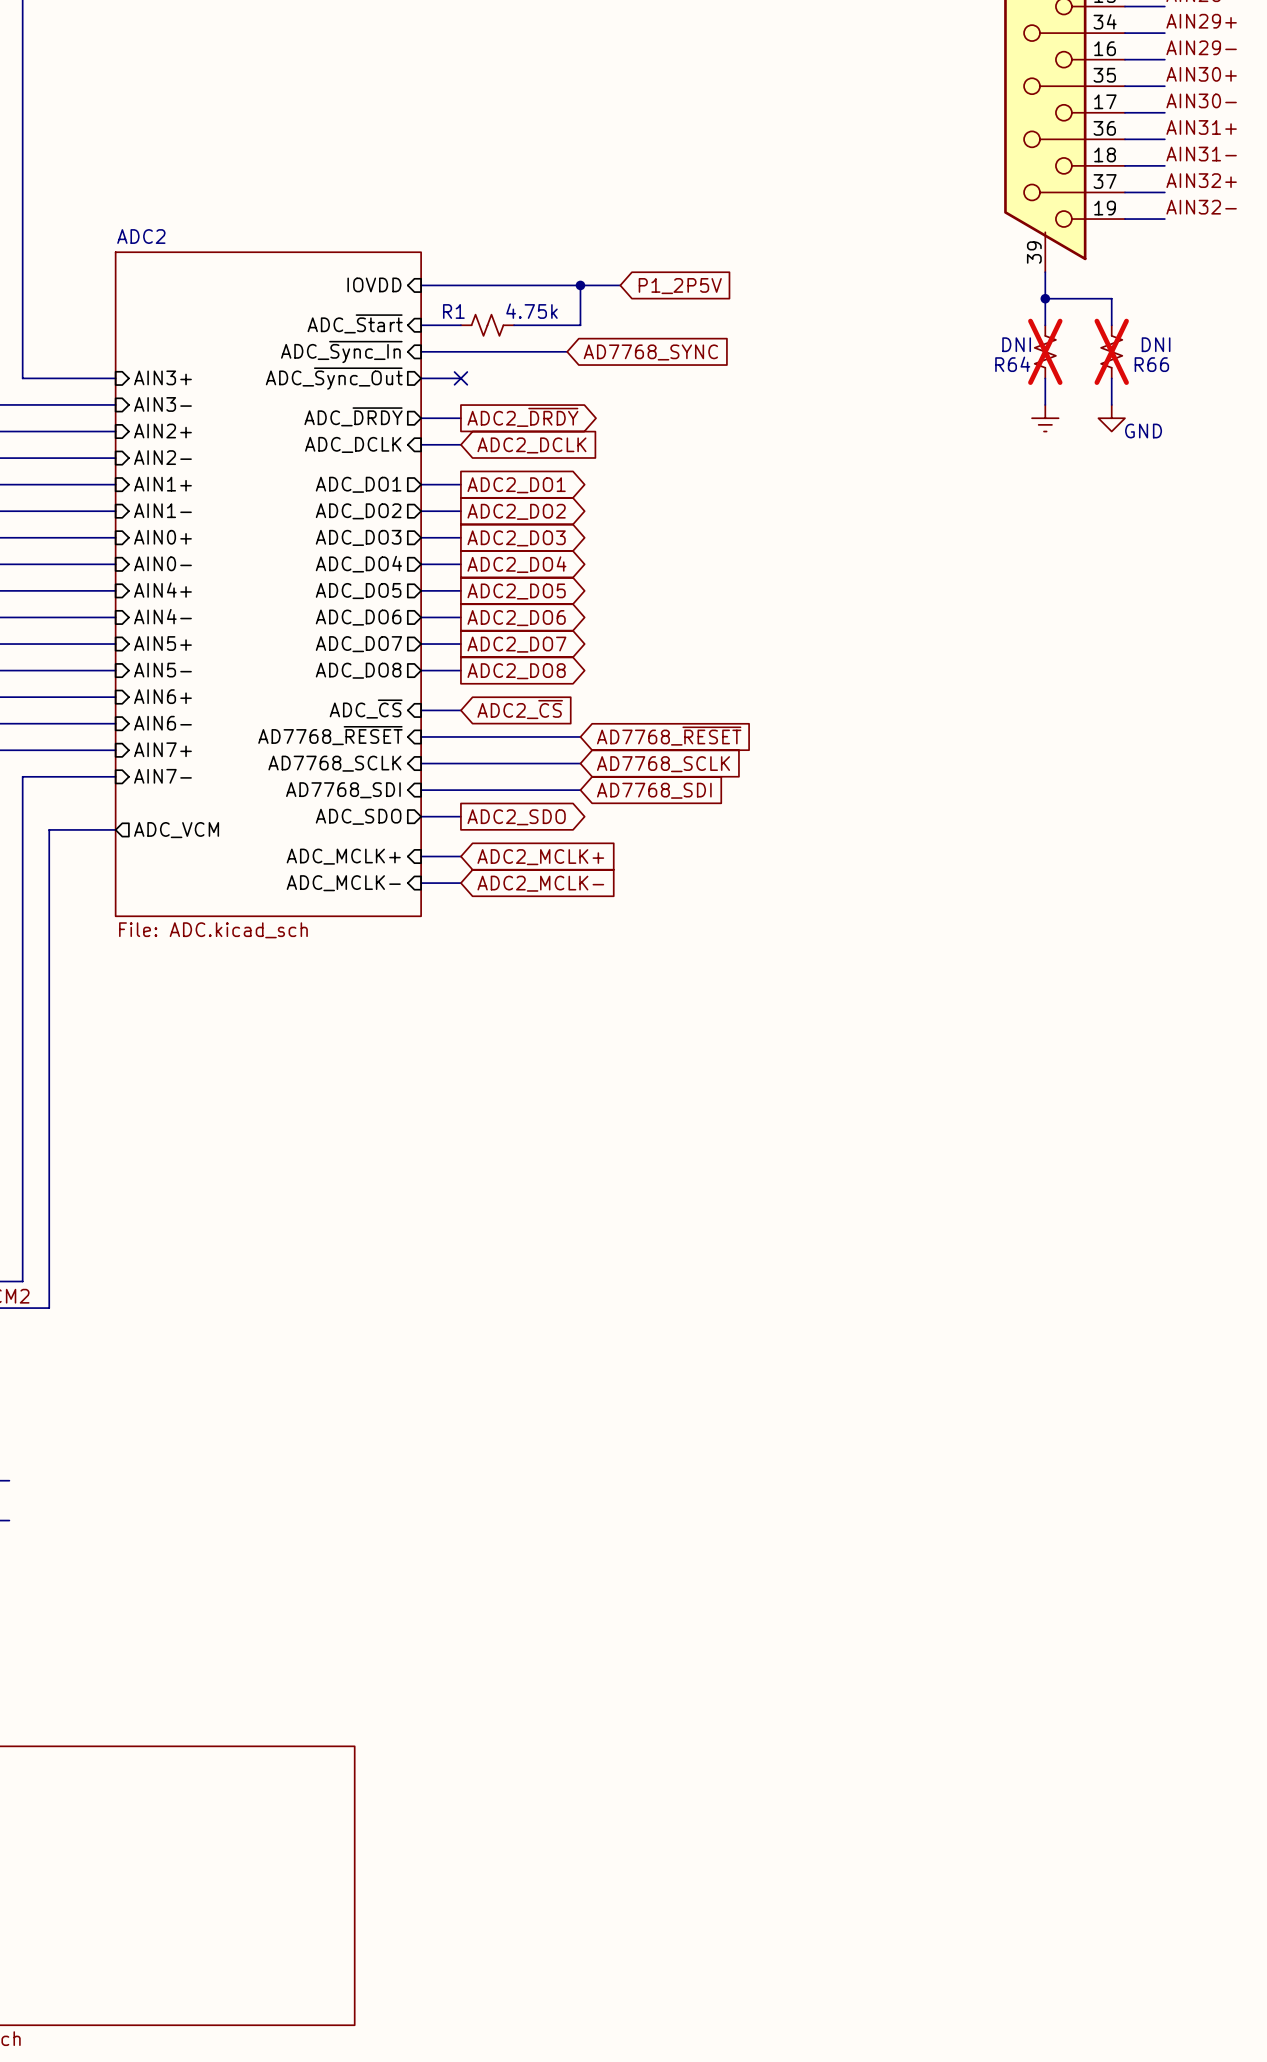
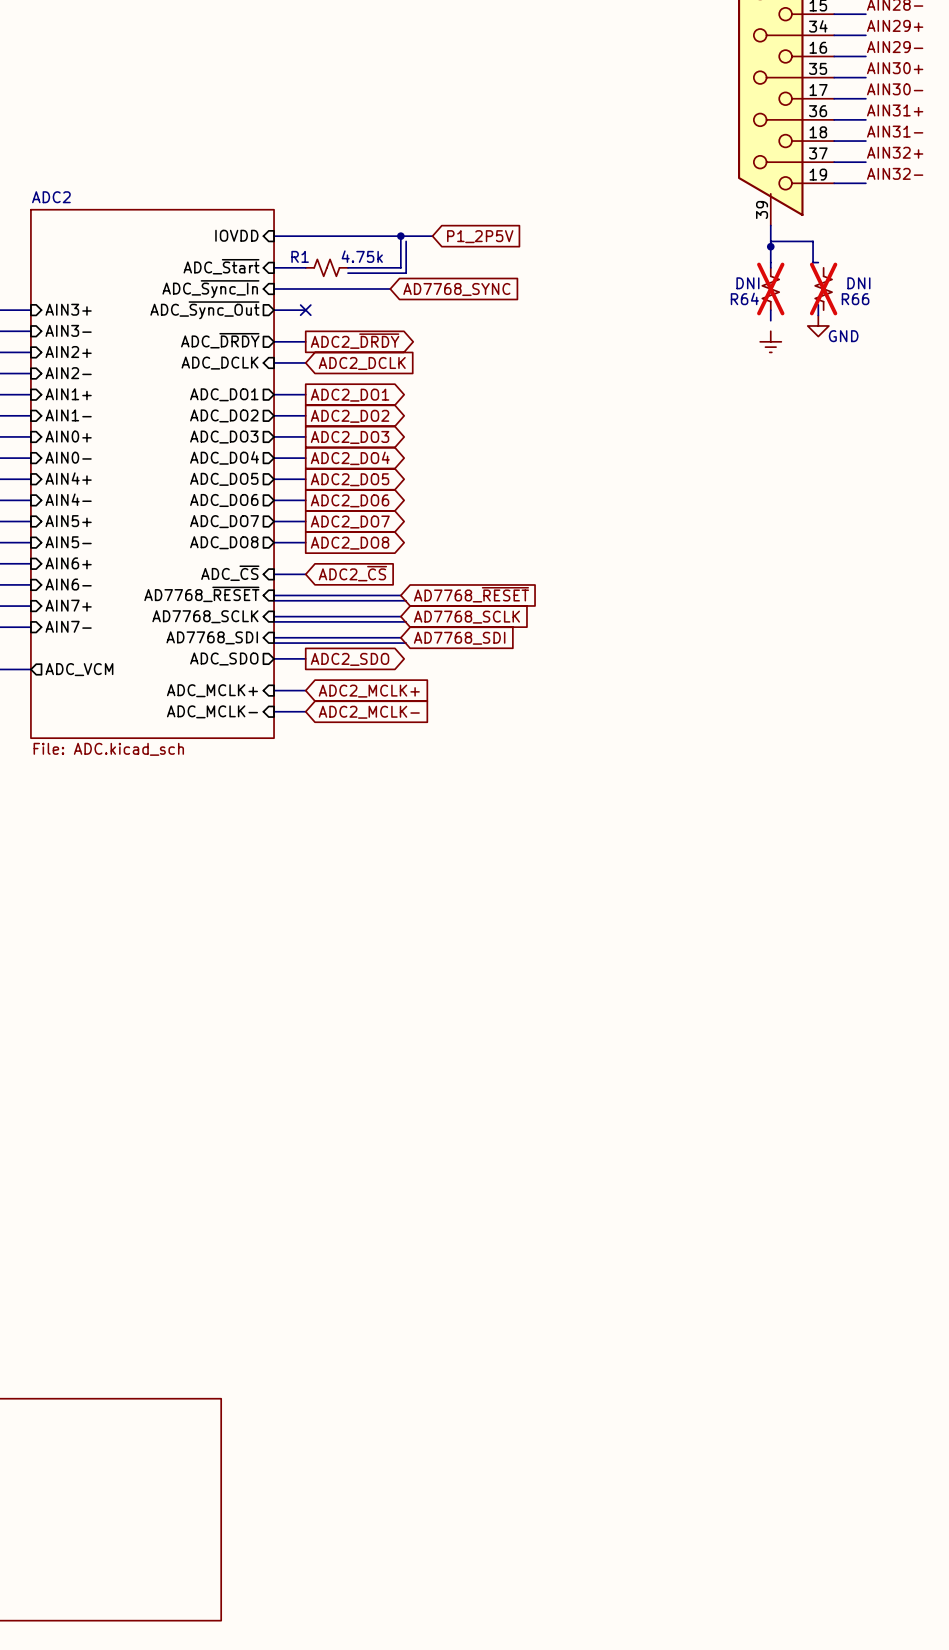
wire: none -> (406, 241) (406, 273) (348, 273)
wire: none -> (770, 241) (813, 241) (813, 262) (818, 262)
wire: (1045, 298) (1111, 298) (1111, 325) -> none
wire: (1111, 378) (1111, 404) -> none
wire: (1045, 391) (1045, 404) -> (818, 304) (818, 315)
power symbol position: GND (1111, 418) -> GND (818, 325)
wire: none -> (274, 600) (406, 600)
wire: none -> (274, 621) (406, 621)
wire: none -> (274, 643) (406, 643)

